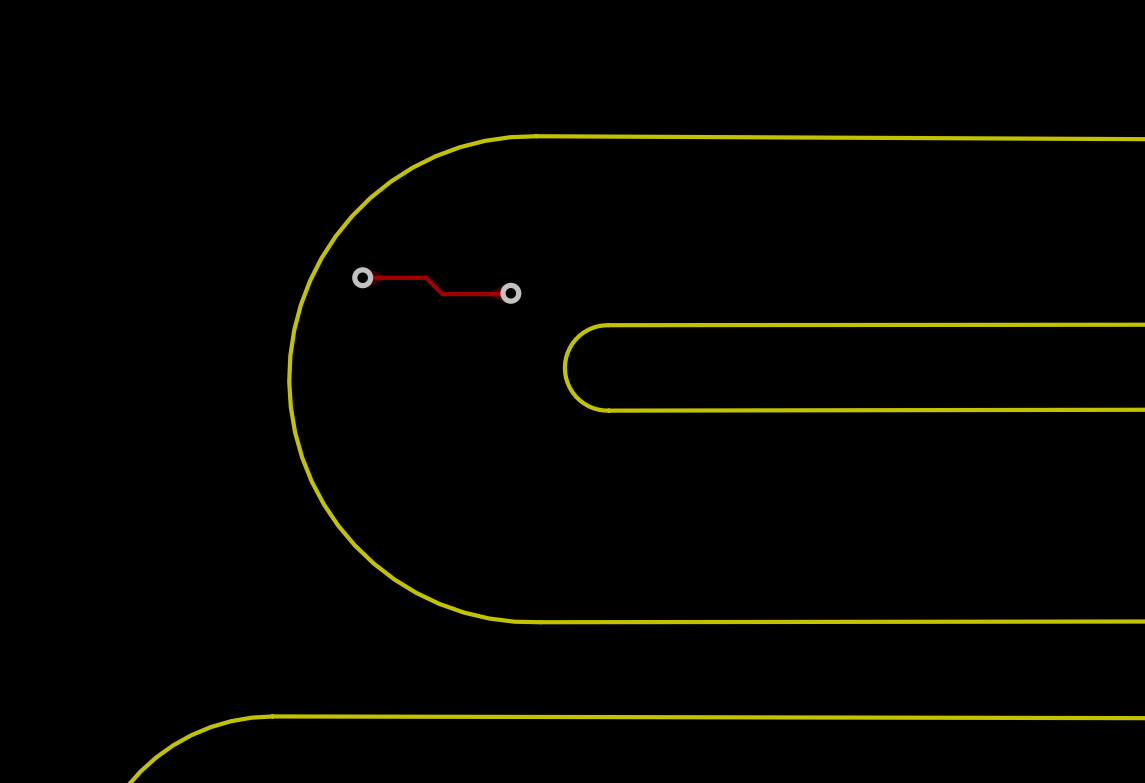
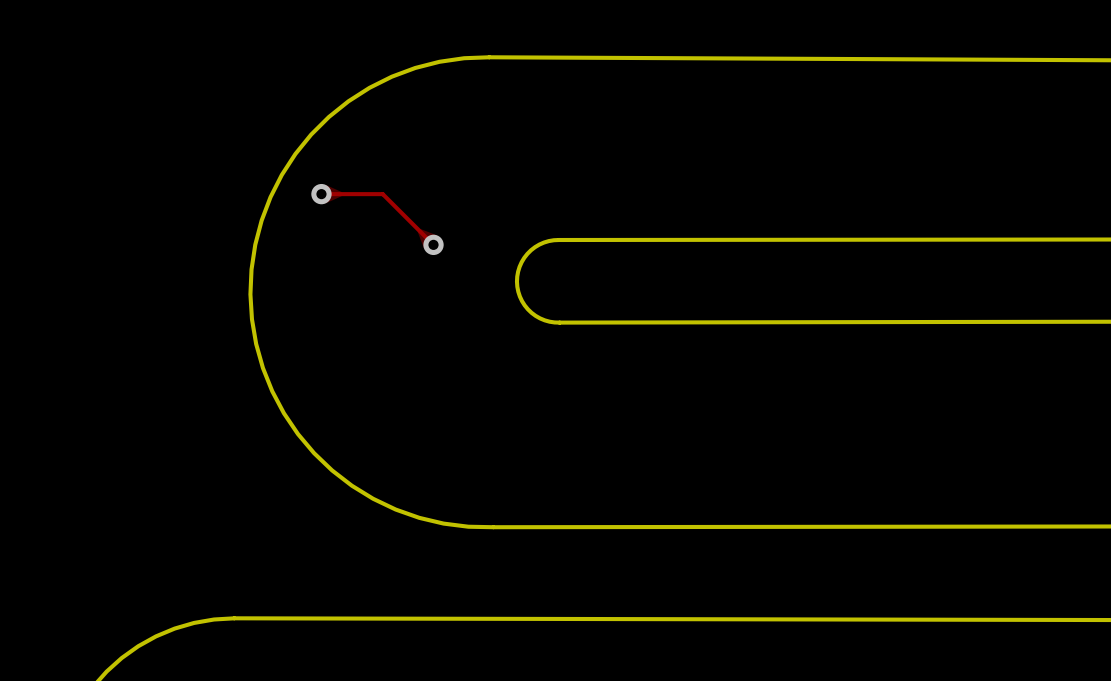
track: (510, 293) (442, 294) -> (433, 244) (398, 209)
via position: (510, 293) -> (433, 244)

